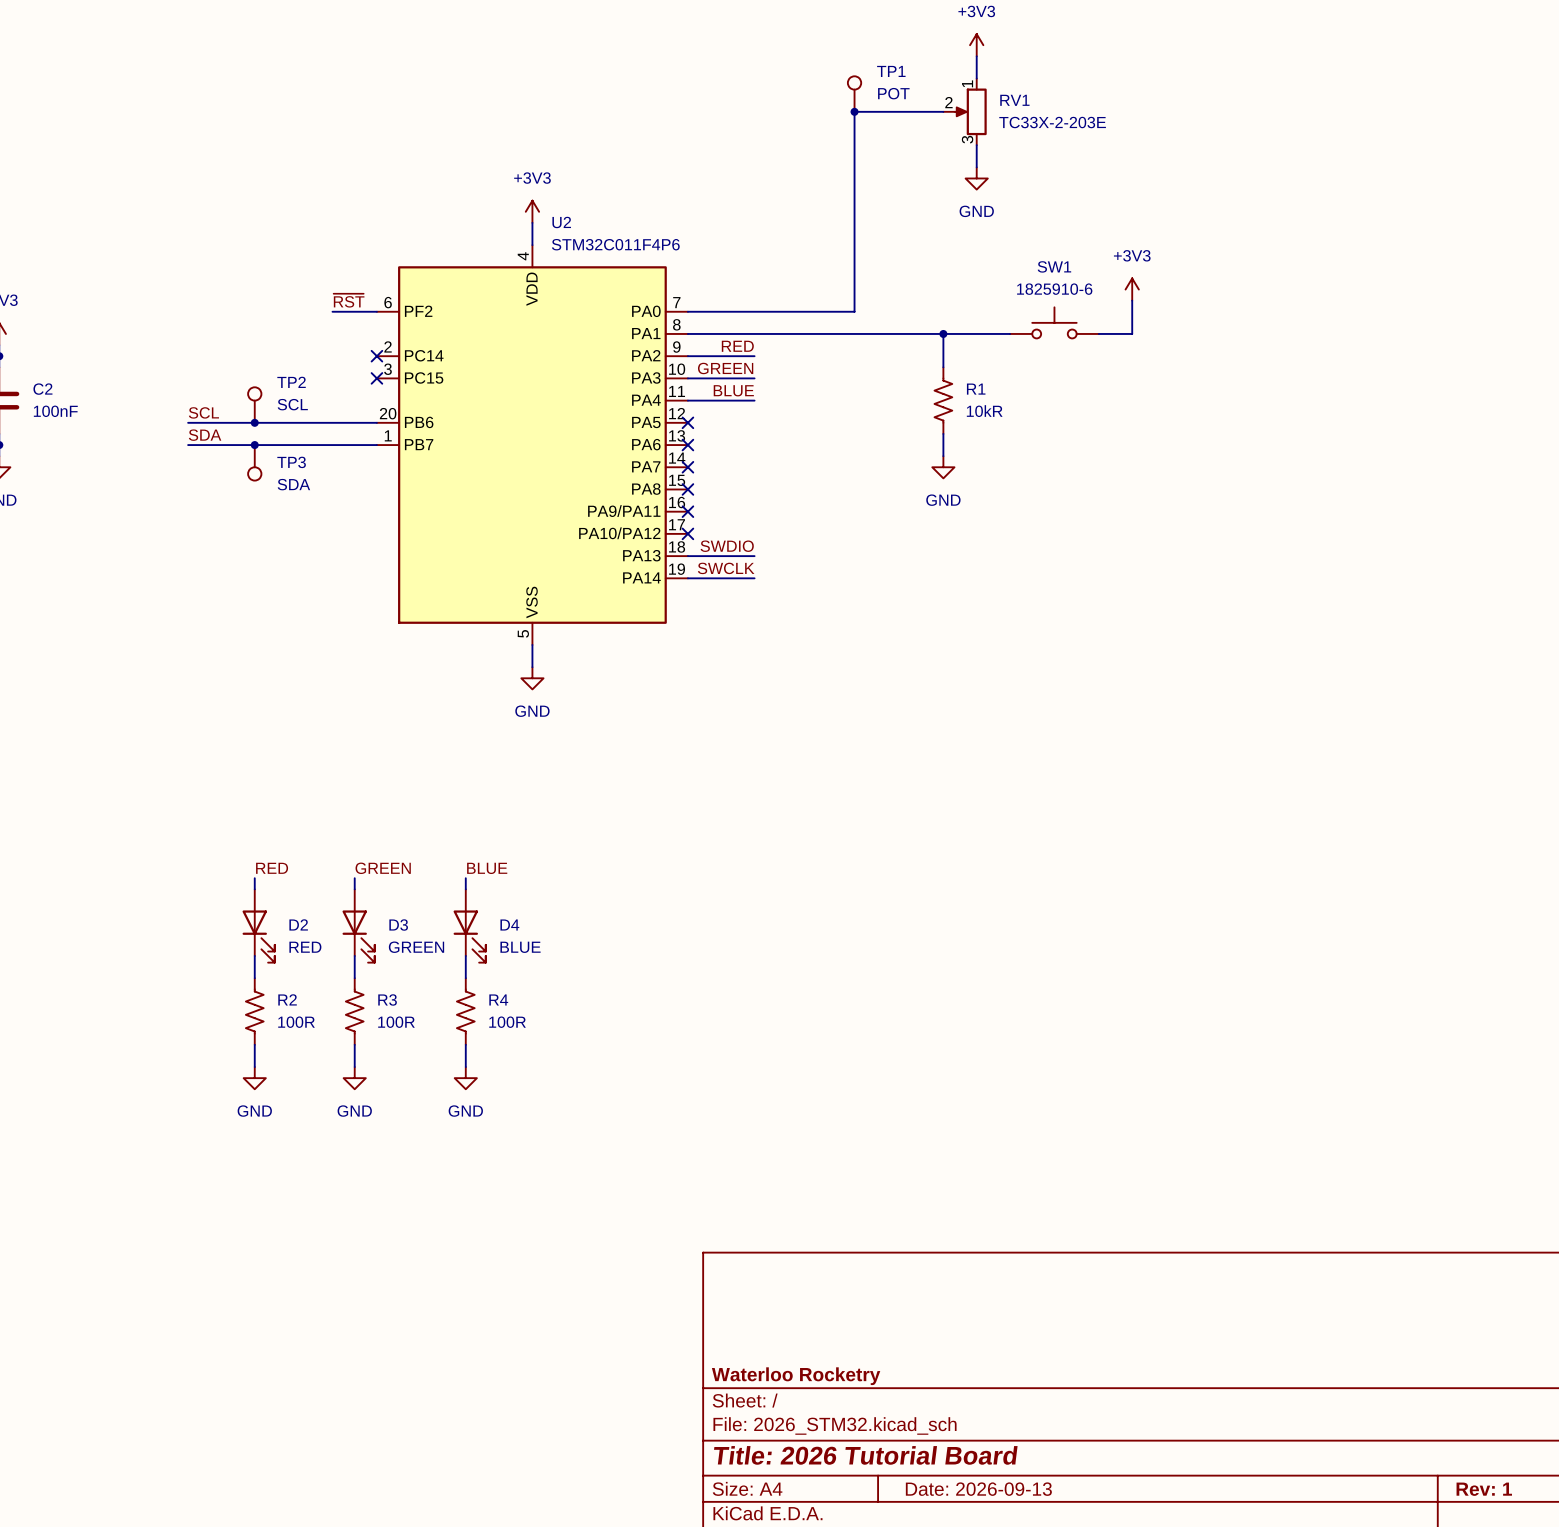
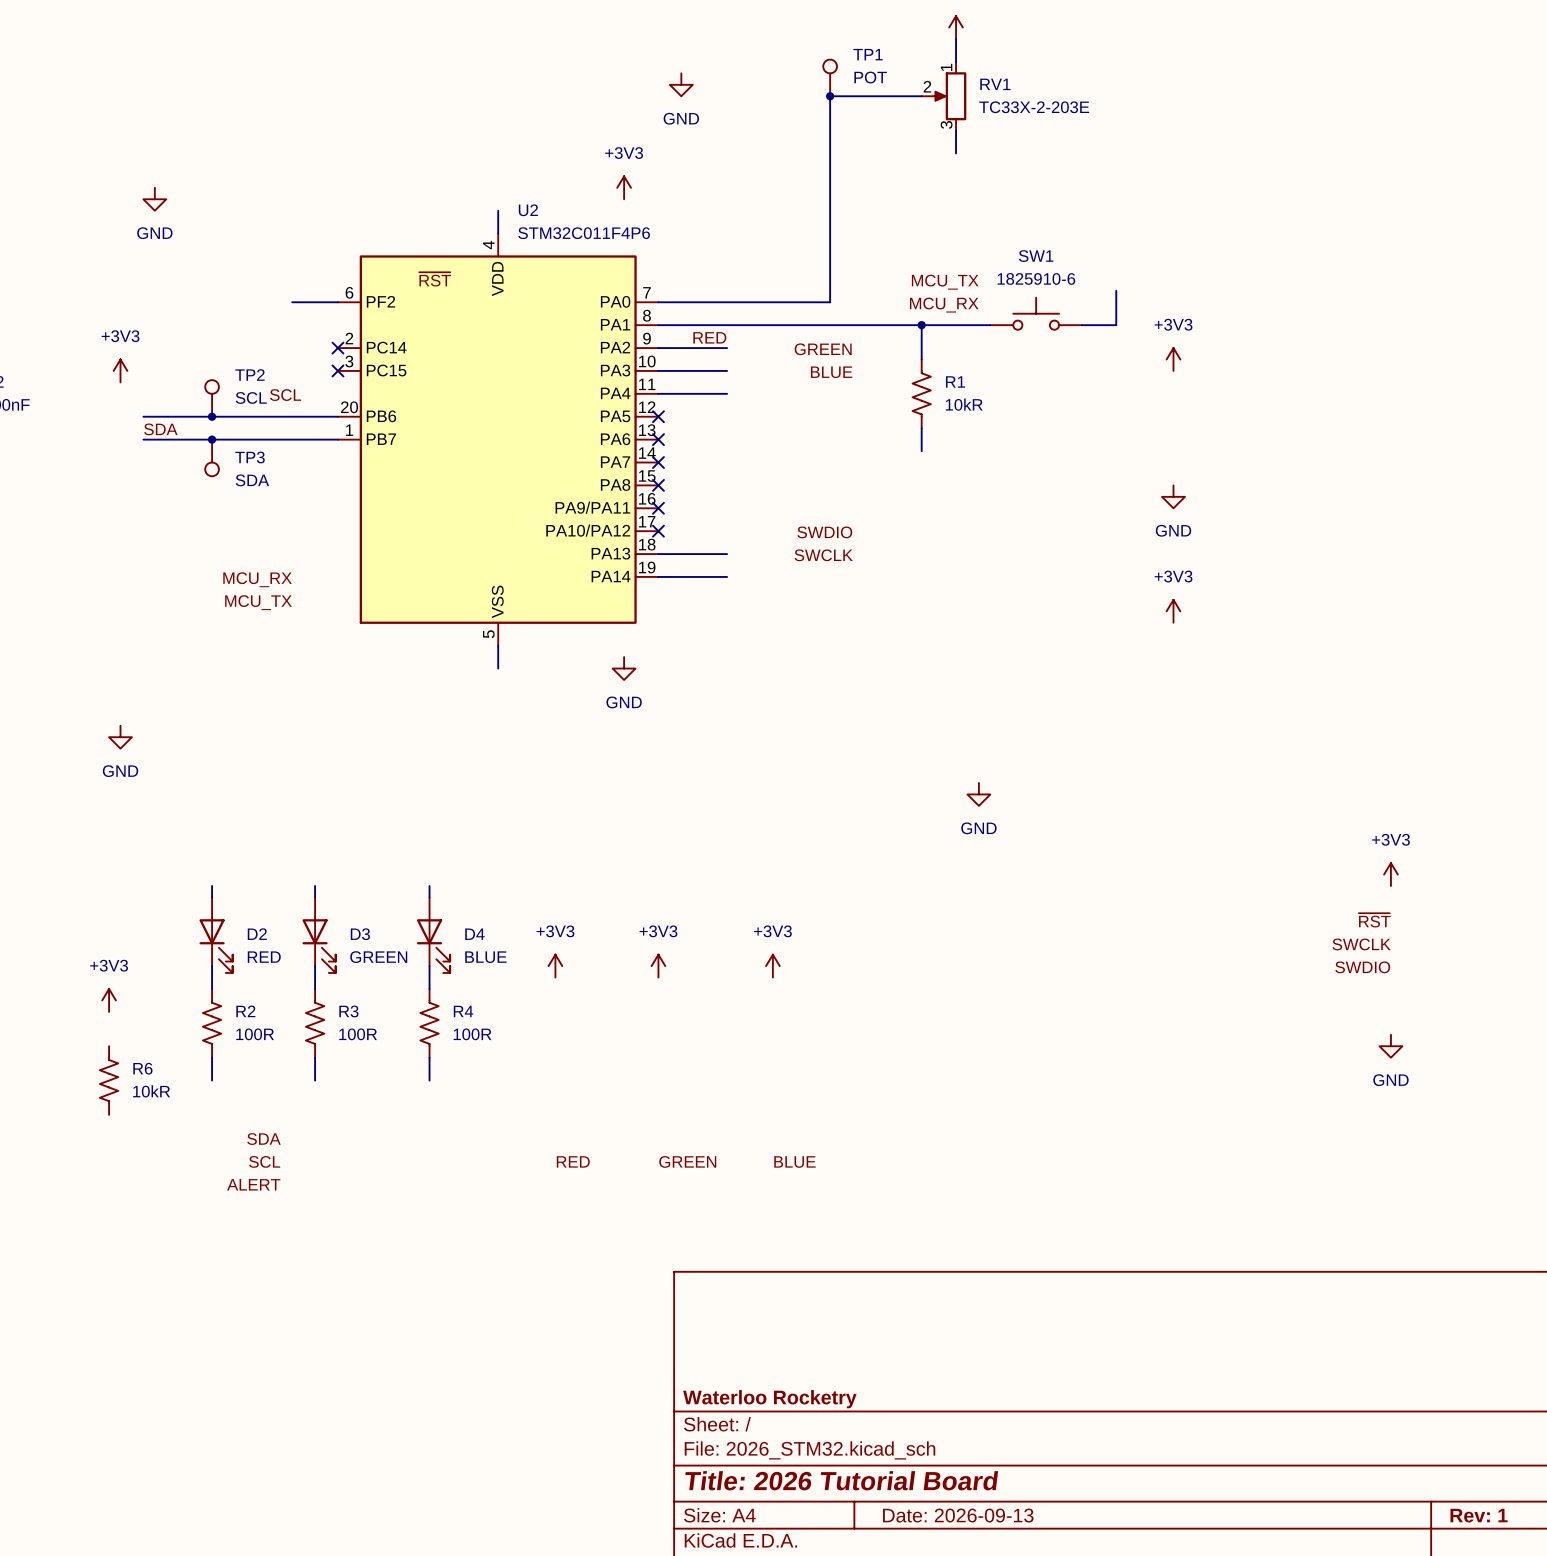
power symbol: none -> GND (681, 84)
power symbol: GND (976, 178) -> none
power symbol: none -> GND (154, 199)
power symbol position: +3V3 (532, 211) -> +3V3 (624, 187)
power symbol position: +3V3 (1132, 289) -> +3V3 (1173, 359)
label: none -> MCU_TX (945, 282)
label position: ~{RST} (349, 300) -> ~{RST} (435, 279)
label: none -> MCU_RX (944, 305)
label position: GREEN (725, 368) -> GREEN (823, 349)
power symbol: none -> +3V3 (120, 370)
label position: BLUE (733, 390) -> BLUE (831, 372)
label position: SCL (203, 412) -> SCL (285, 395)
power symbol: GND (943, 467) -> none
power symbol: none -> GND (1173, 496)
label position: SWDIO (727, 546) -> SWDIO (824, 532)
label position: SWCLK (726, 568) -> SWCLK (823, 555)
label: none -> MCU_RX (257, 579)
label: none -> MCU_TX (258, 602)
power symbol: none -> +3V3 (1173, 611)
power symbol position: GND (532, 678) -> GND (624, 668)
power symbol: none -> GND (120, 737)
power symbol: none -> GND (978, 794)
power symbol: none -> +3V3 (1390, 874)
label: RED (272, 868) -> none
label: GREEN (383, 868) -> none
label: BLUE (487, 868) -> none
label: none -> ~{RST} (1374, 920)
label: none -> SWCLK (1361, 944)
power symbol: none -> +3V3 (555, 966)
power symbol: none -> +3V3 (658, 966)
power symbol: none -> +3V3 (772, 966)
label: none -> SWDIO (1362, 967)
power symbol: none -> +3V3 (109, 1000)
power symbol: none -> GND (1390, 1046)
R6: none -> 10kR (109, 1080)
power symbol: GND (254, 1078) -> none
power symbol: GND (354, 1078) -> none
power symbol: GND (465, 1078) -> none
label: none -> SDA (264, 1139)
label: none -> SCL (264, 1161)
label: none -> RED (573, 1161)
label: none -> GREEN (687, 1161)
label: none -> BLUE (794, 1162)
label: none -> ALERT (253, 1184)

